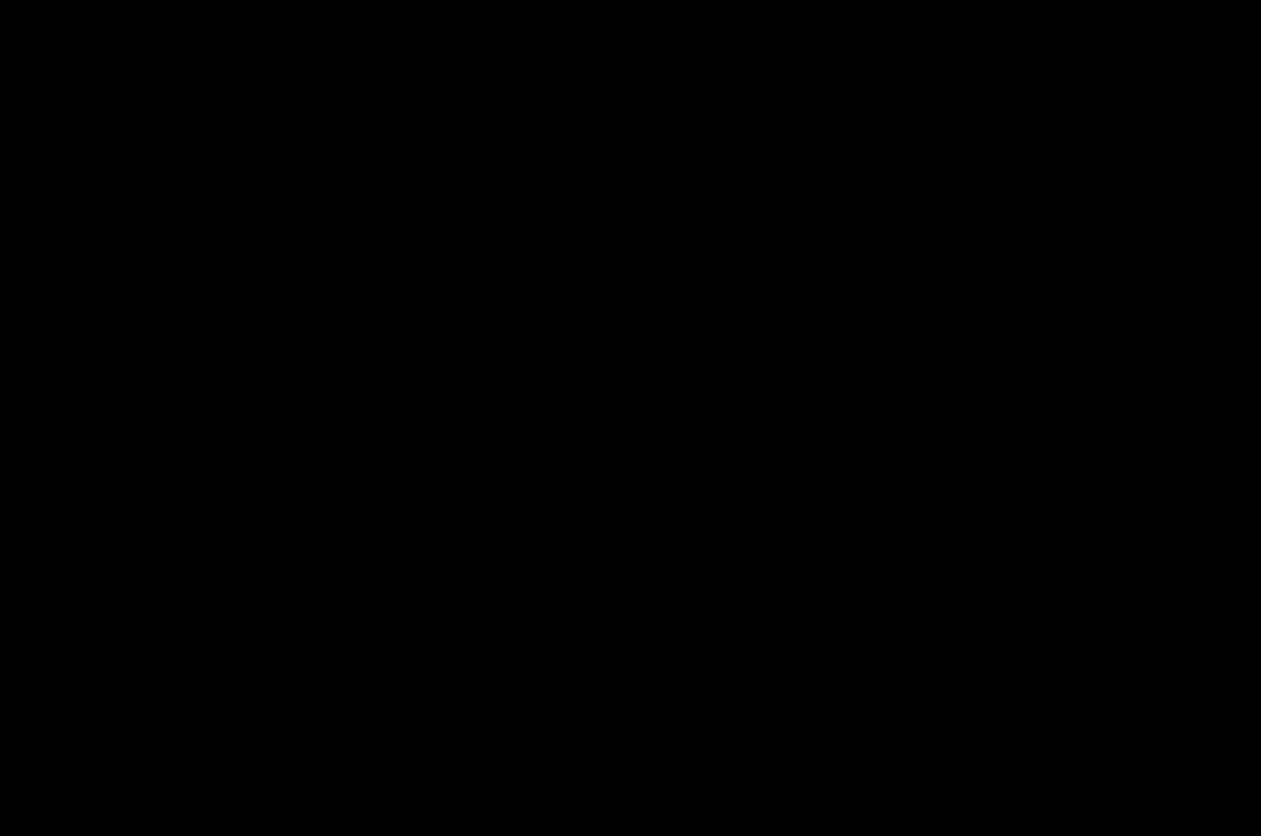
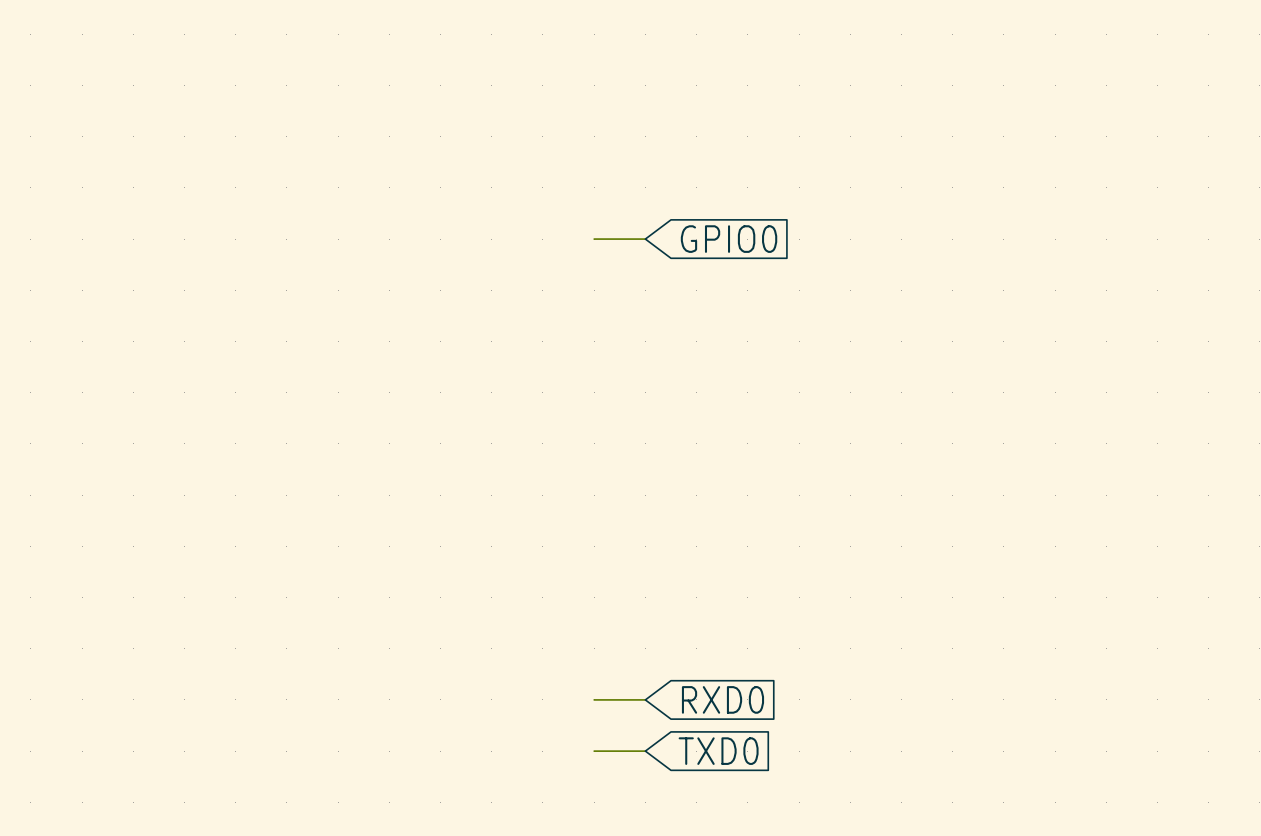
wire: none -> (594, 239) (645, 239)
global label: none -> GPIO0 (729, 239)
wire: none -> (594, 699) (645, 699)
global label: none -> RXD0 (722, 699)
wire: none -> (594, 751) (645, 751)
global label: none -> TXD0 (718, 751)

